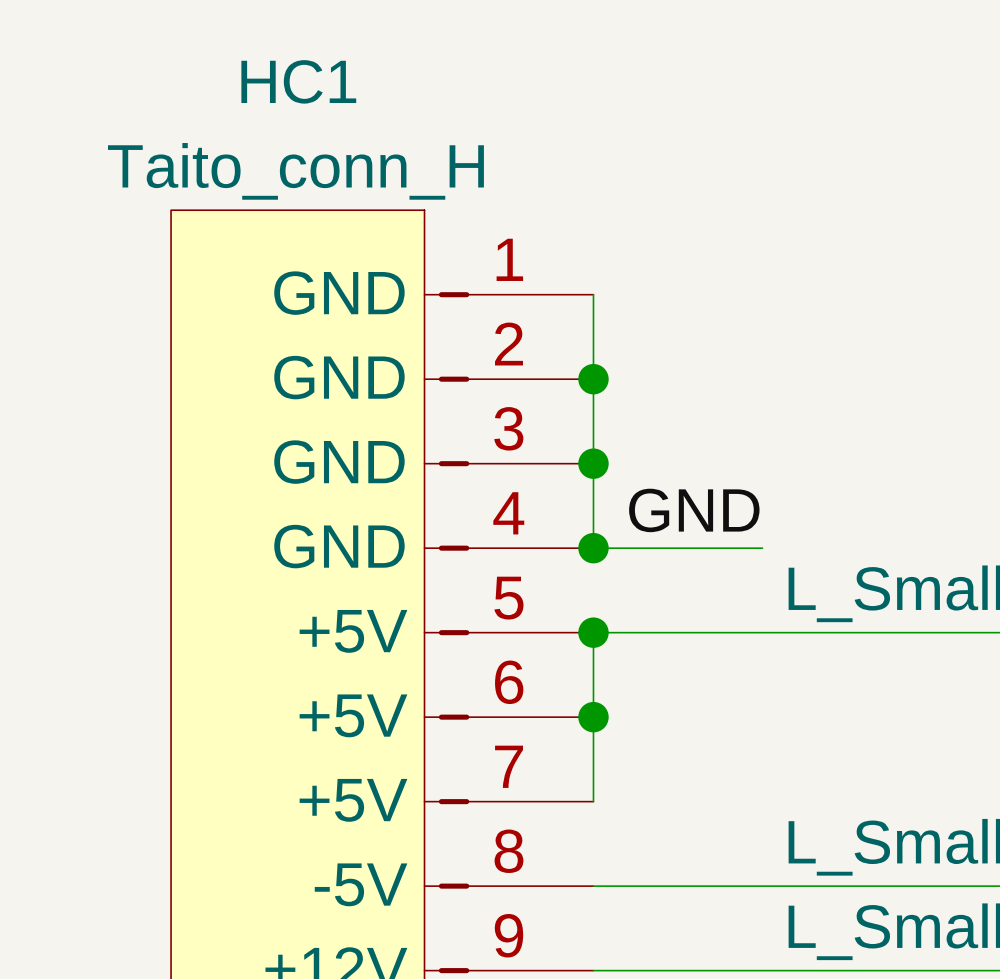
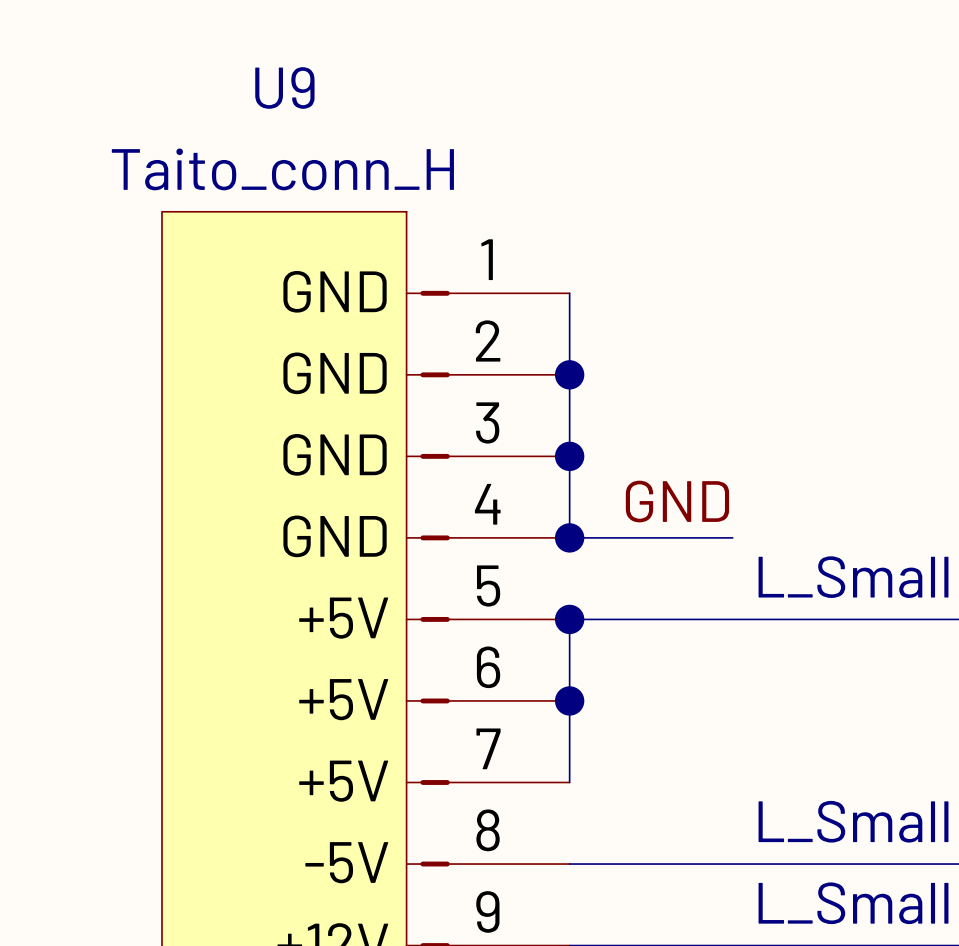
HC1 name: HC1 (298, 81) -> U9 (284, 87)

